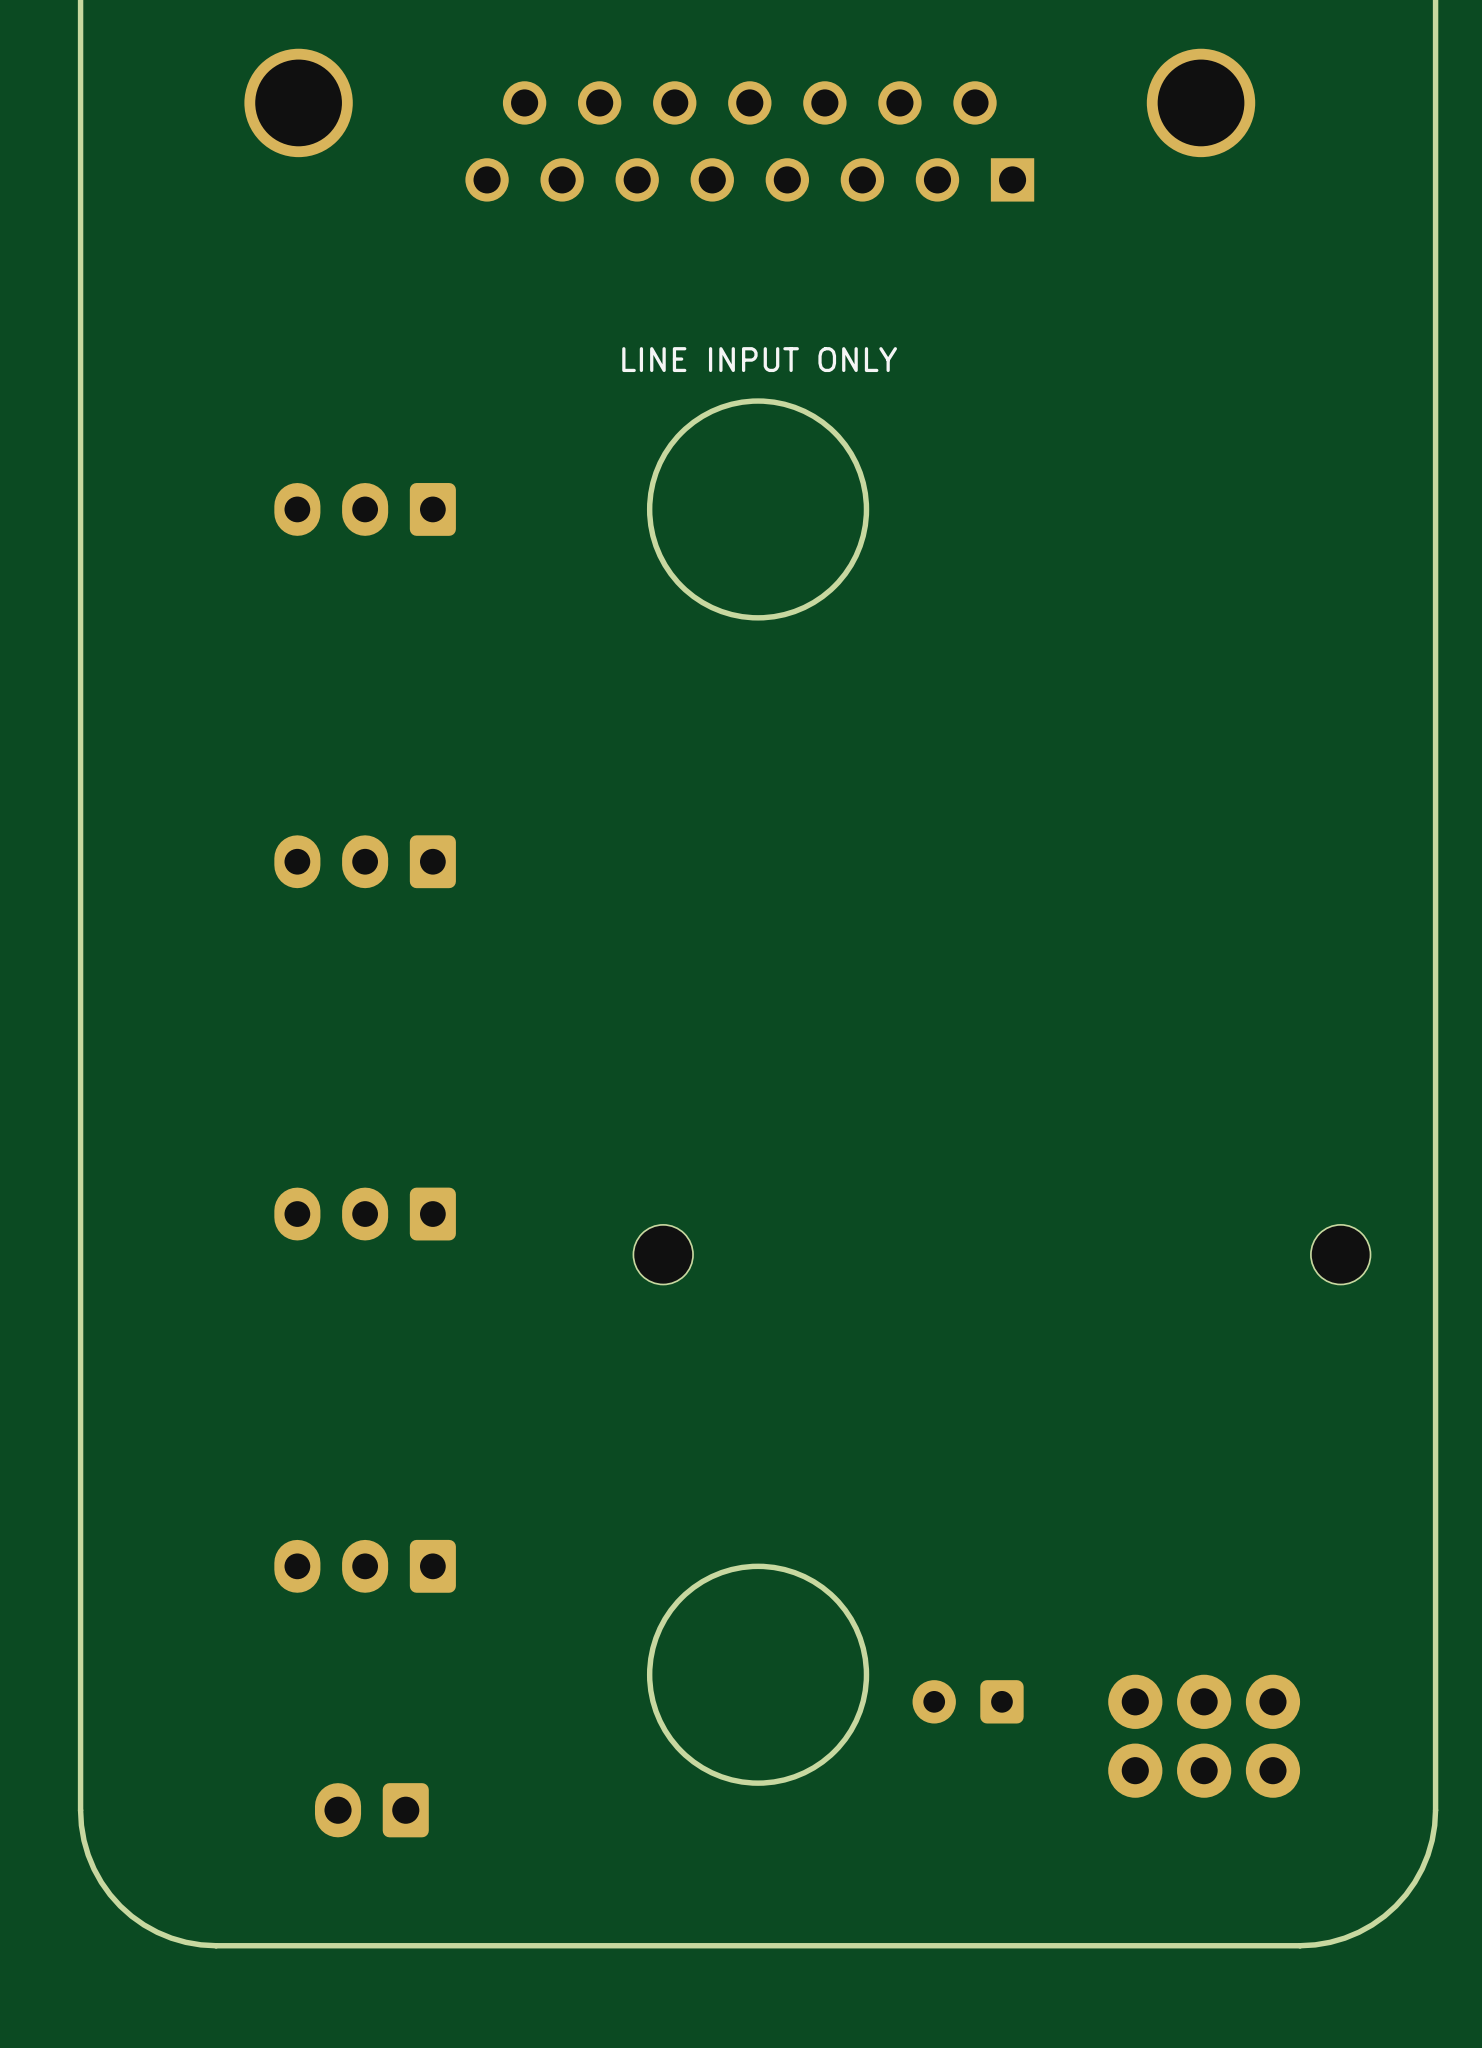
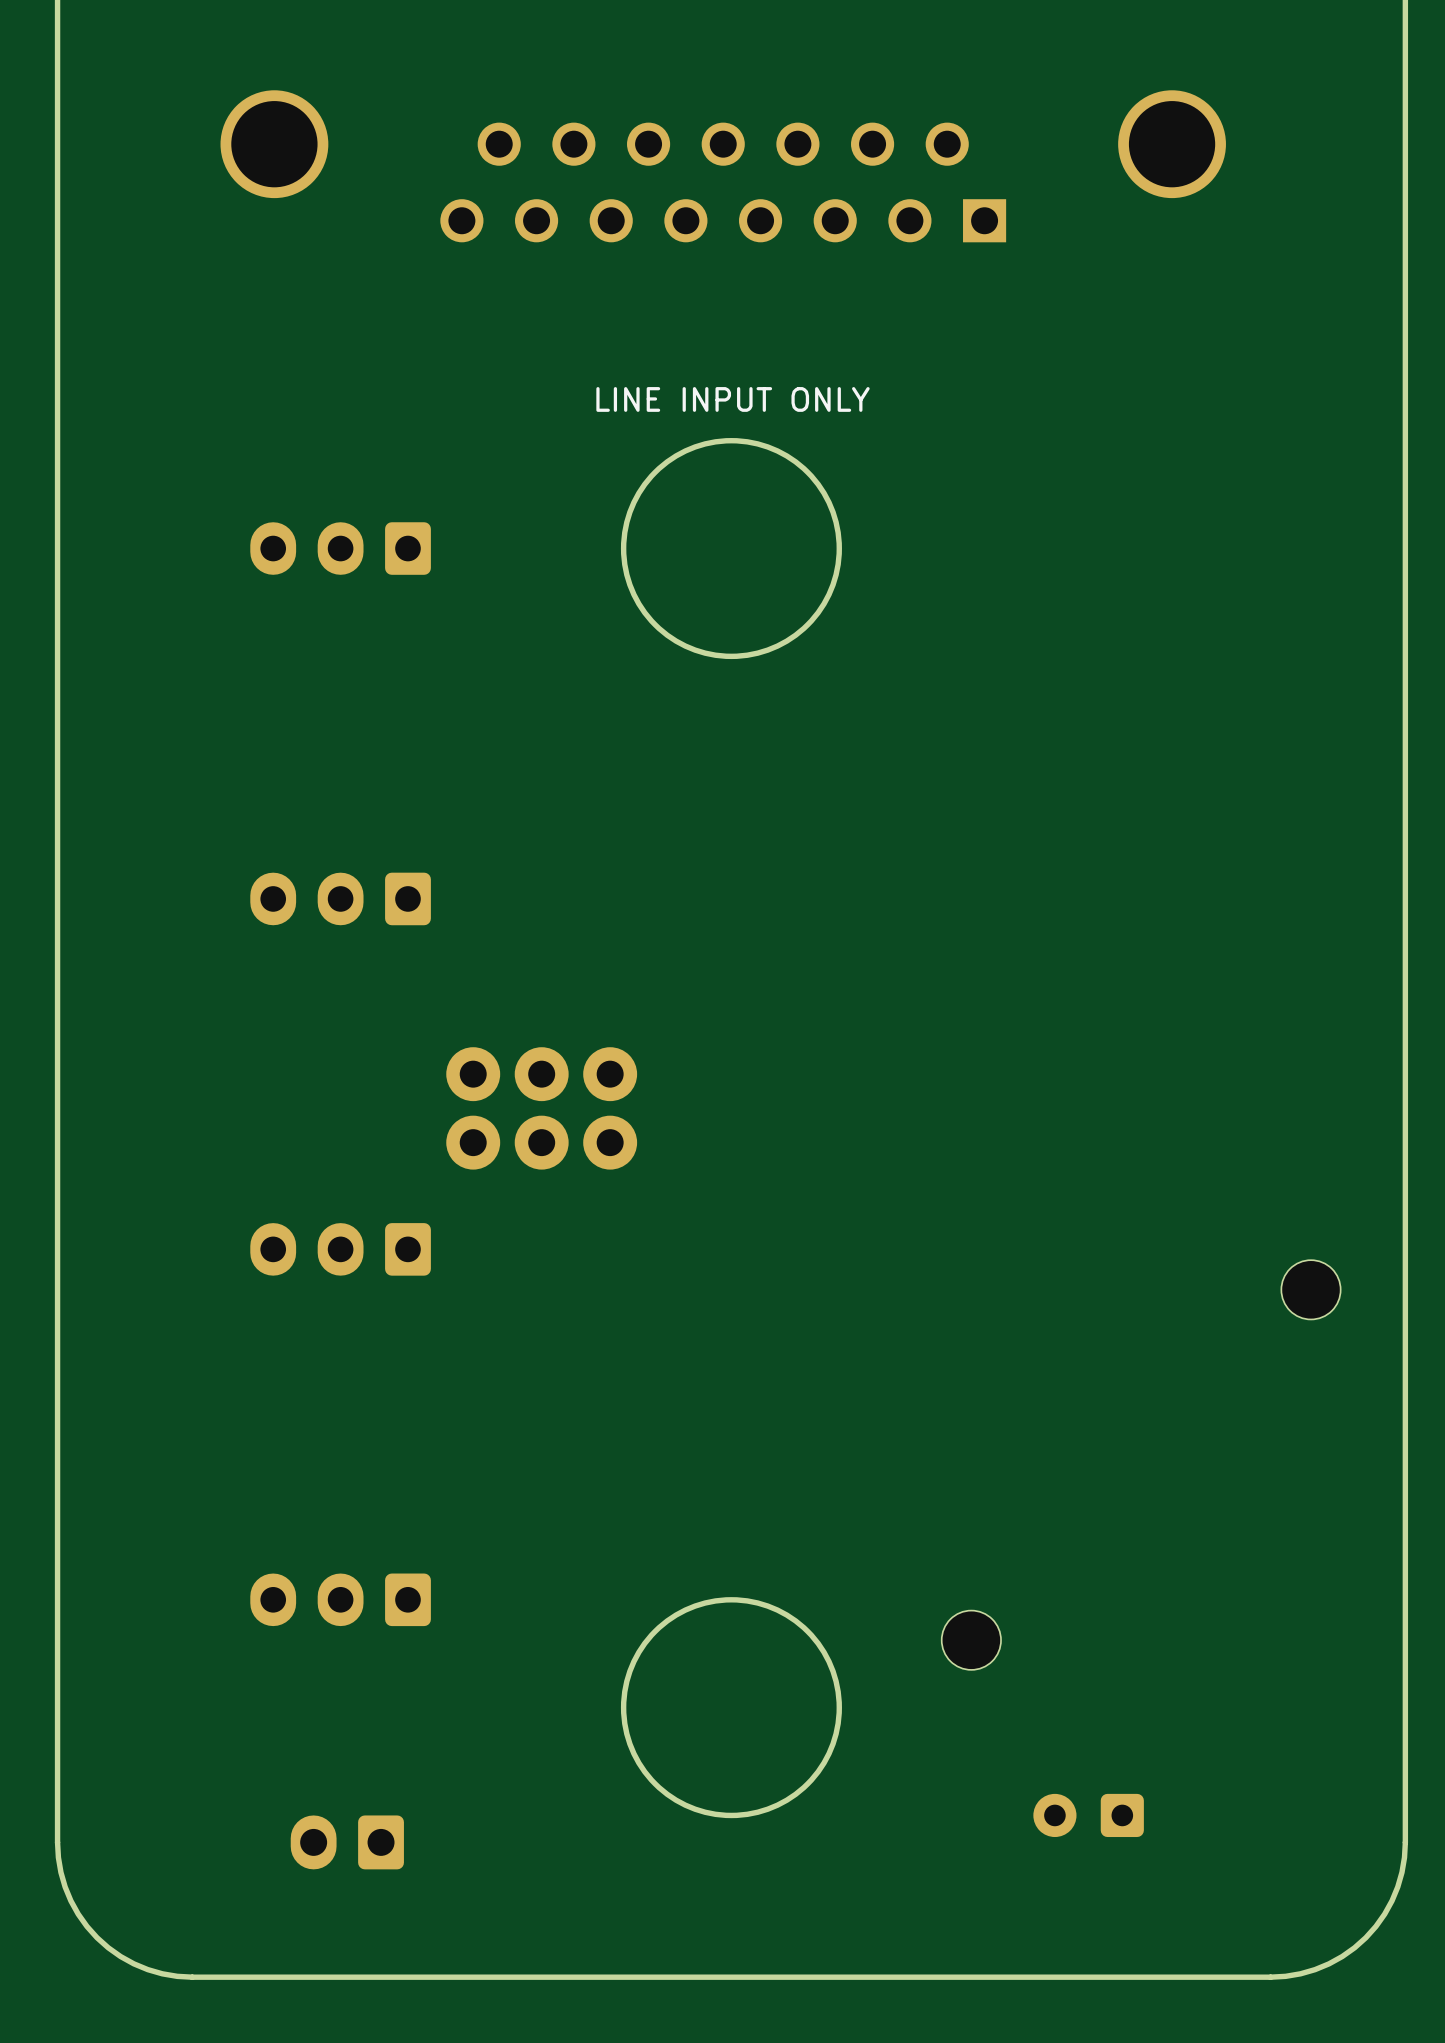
part: none -> (541, 1108)
part position: (663, 1254) -> (971, 1640)
part position: (968, 1701) -> (1088, 1815)
part: (1204, 1736) -> none

